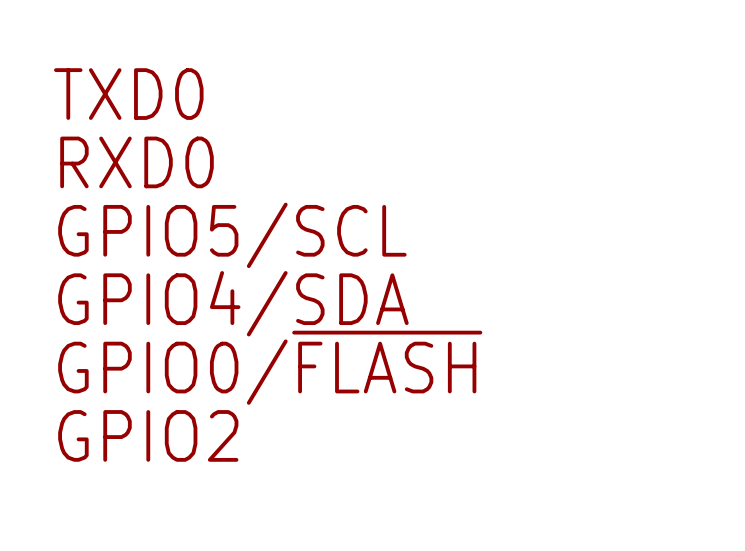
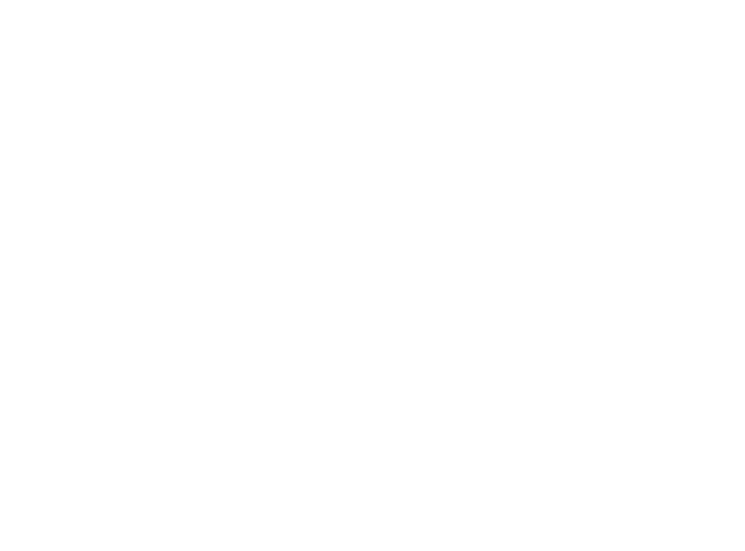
text: TXD0 (128, 94) -> none
text: RXD0 (137, 162) -> none
text: GPIO5/SCL (232, 235) -> none
text: GPIO4/SDA (233, 303) -> none
text: GPIO0/~{FLASH} (270, 367) -> none
text: GPIO2 (148, 435) -> none

